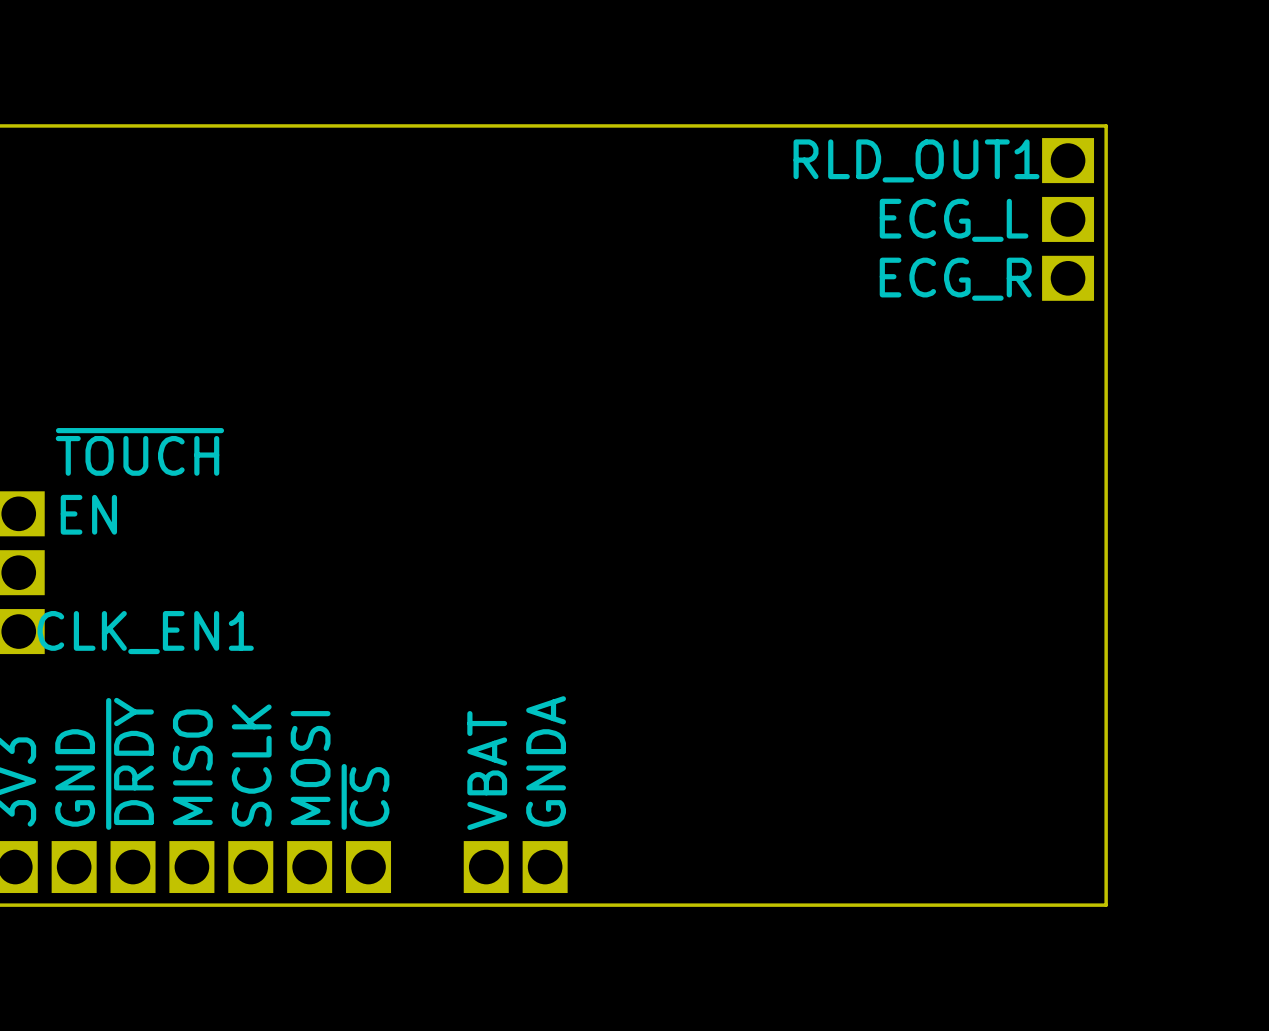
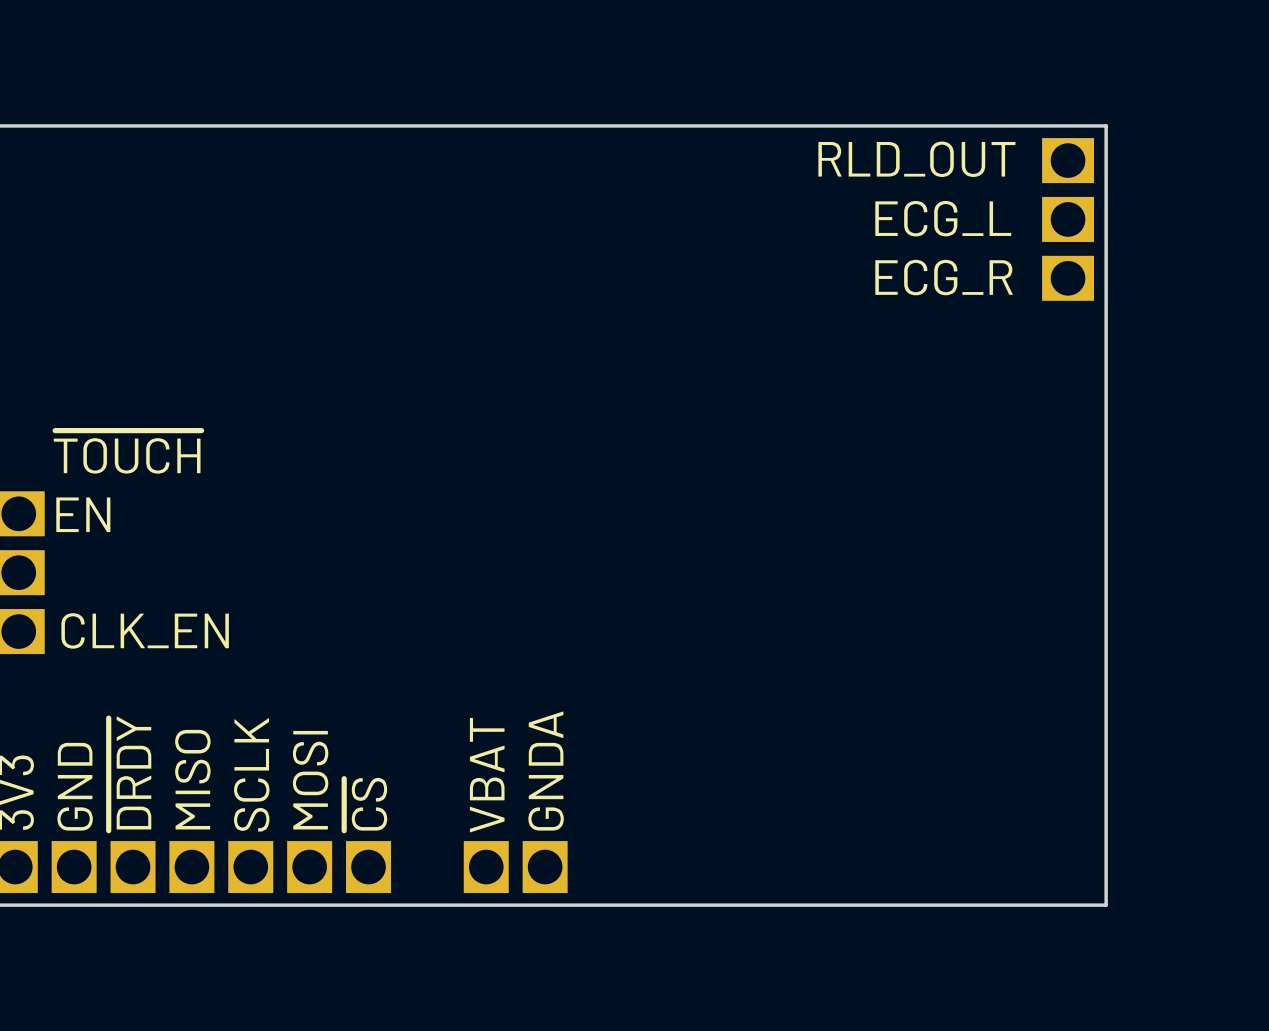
RLD_OUT1 name: RLD_OUT1 (916, 160) -> RLD_OUT (916, 159)
CLK_EN1 name: CLK_EN1 (145, 632) -> CLK_EN (145, 630)

